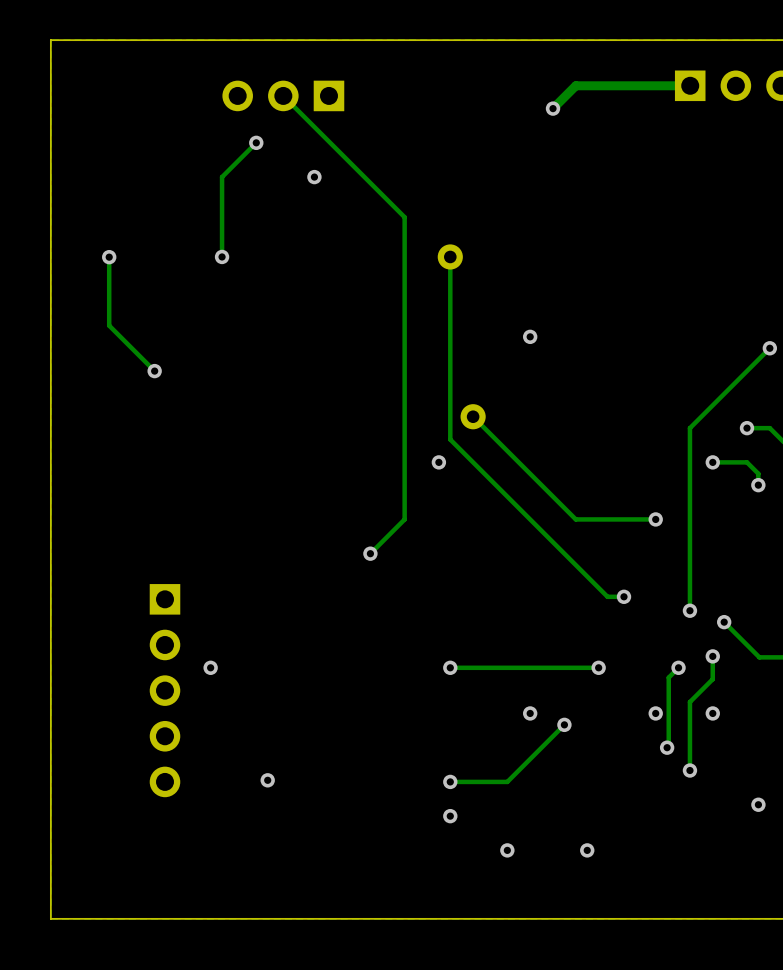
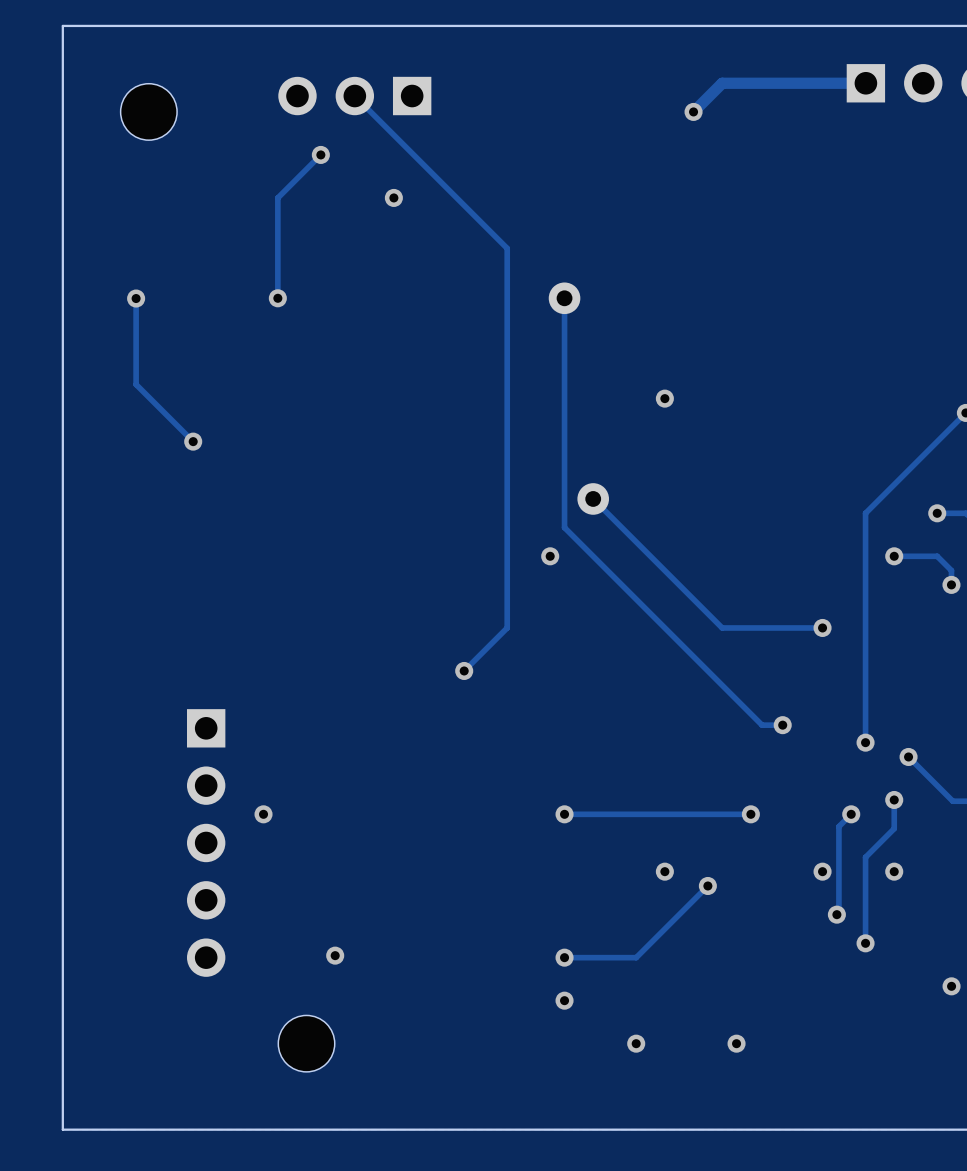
part: none -> (148, 111)
part: none -> (306, 1043)

